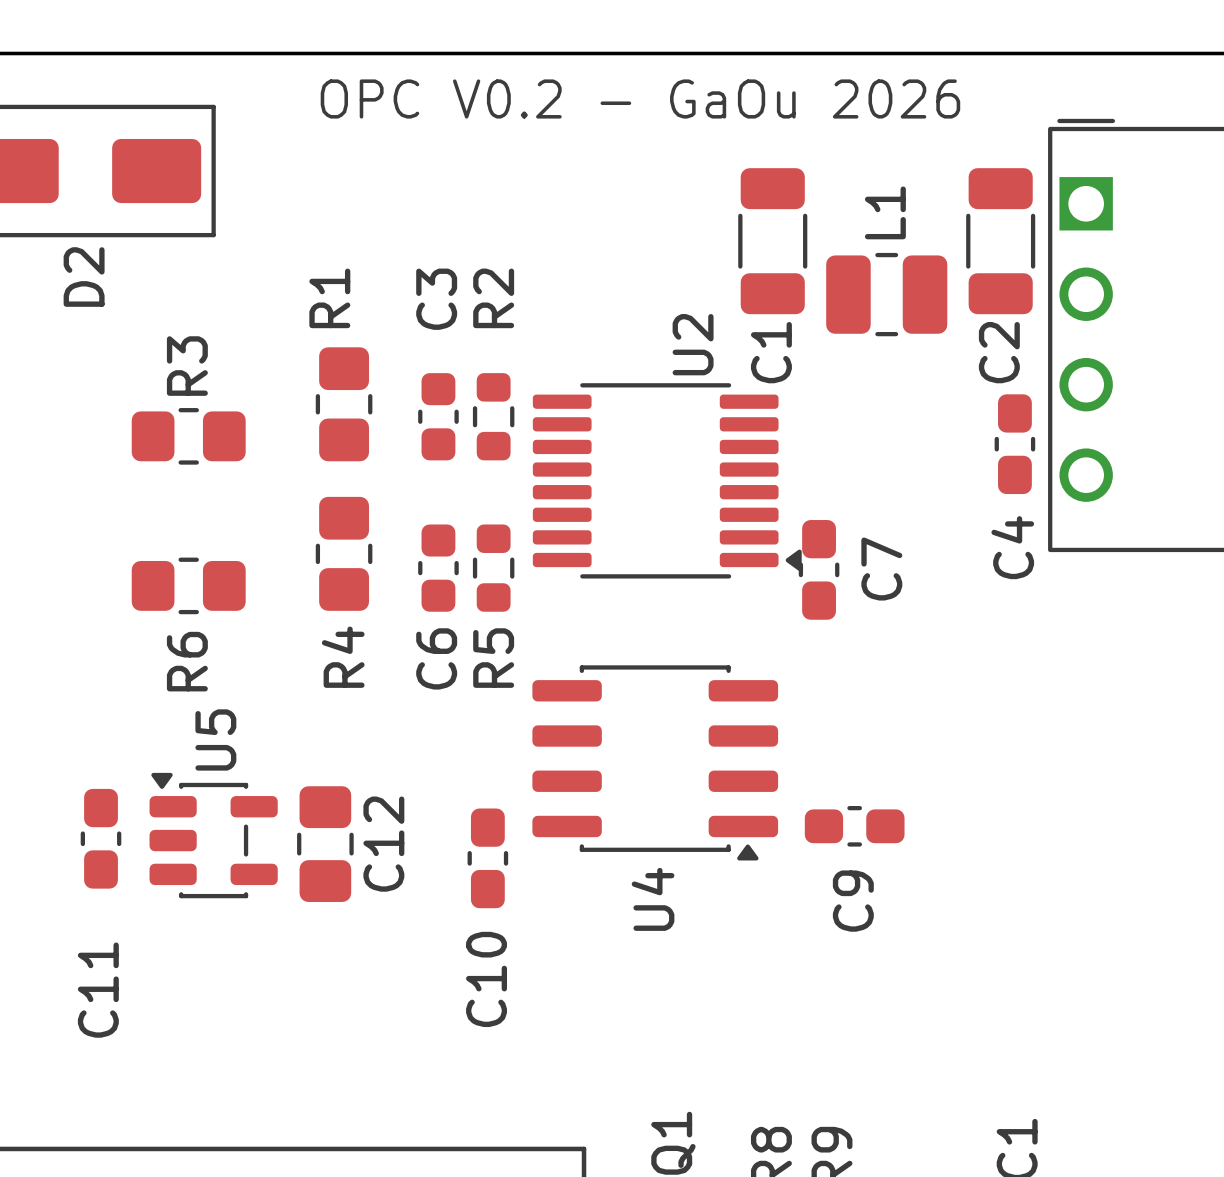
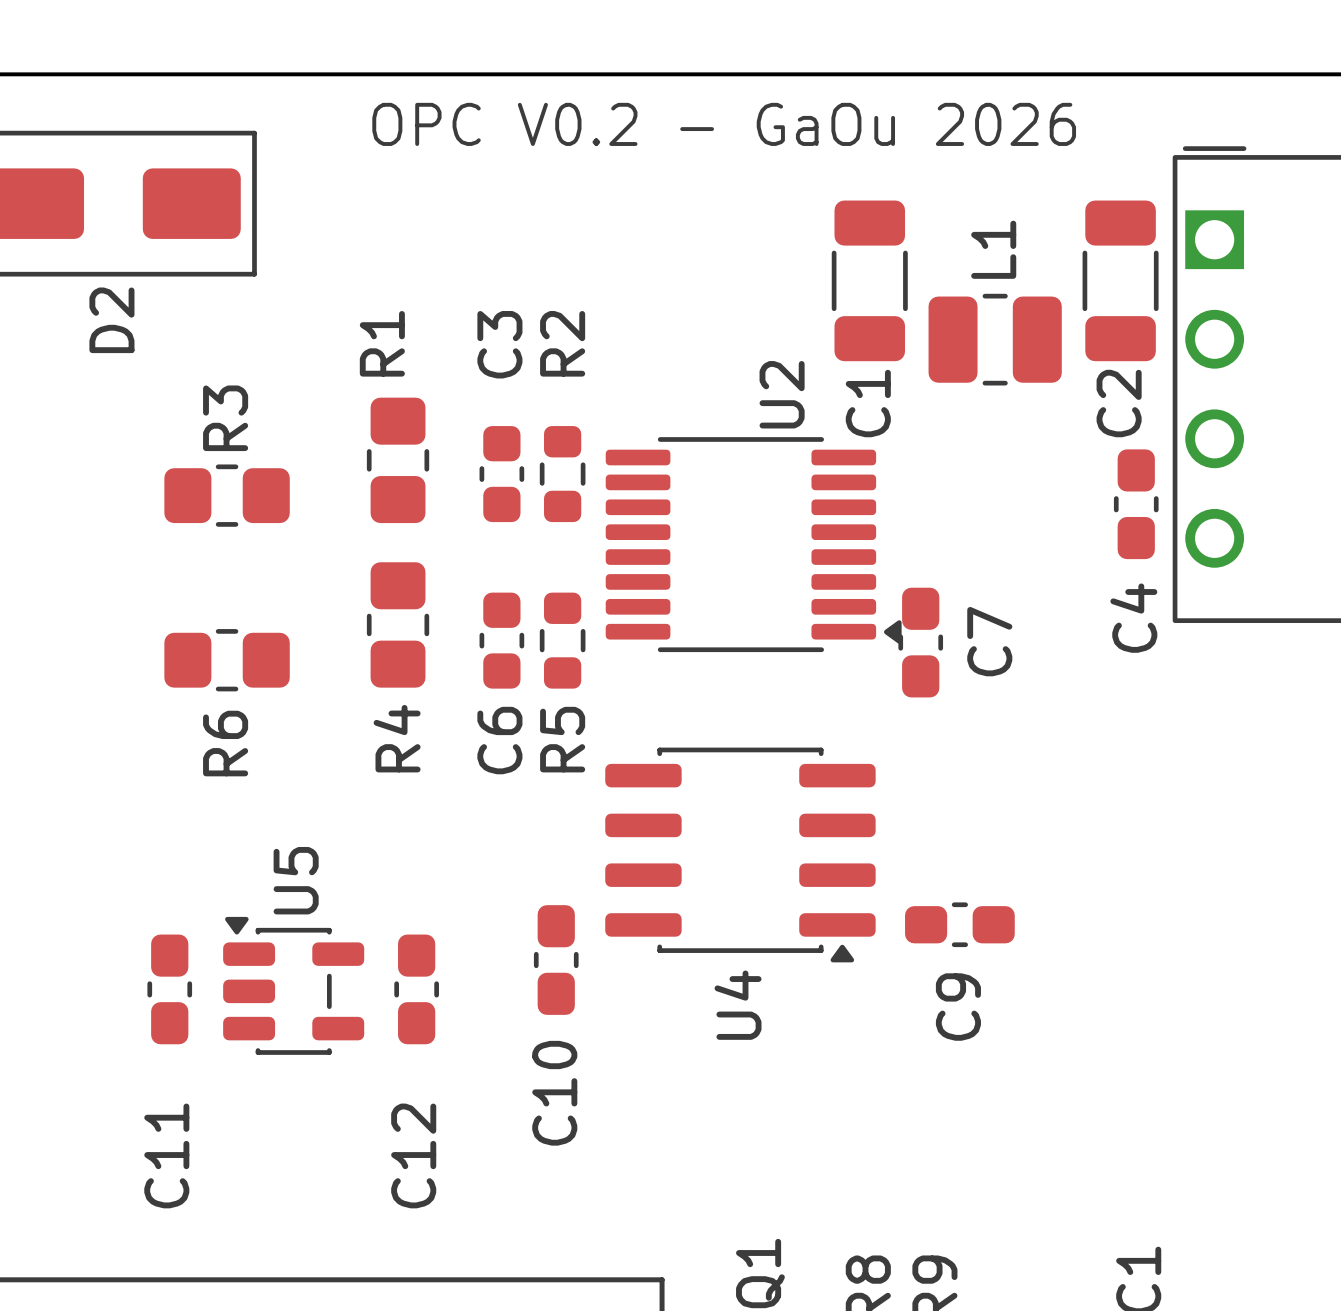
C12 footprint: [297, 786, 354, 902] -> [394, 934, 439, 1045]
U5 position: (213, 835) -> (293, 985)
C11 position: (101, 838) -> (169, 989)
C12 name position: C12 (383, 844) -> C12 (413, 1155)

